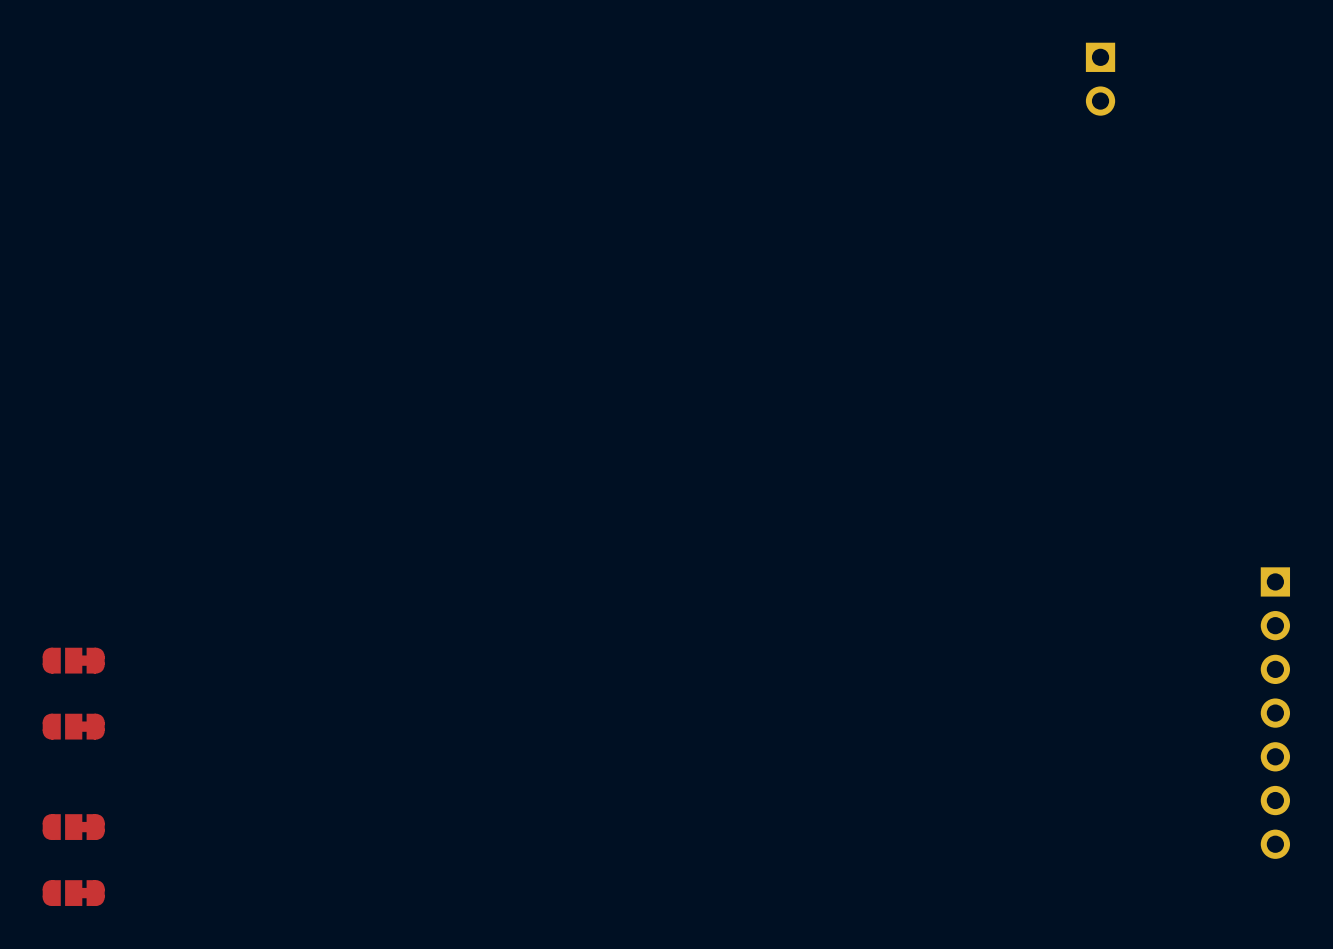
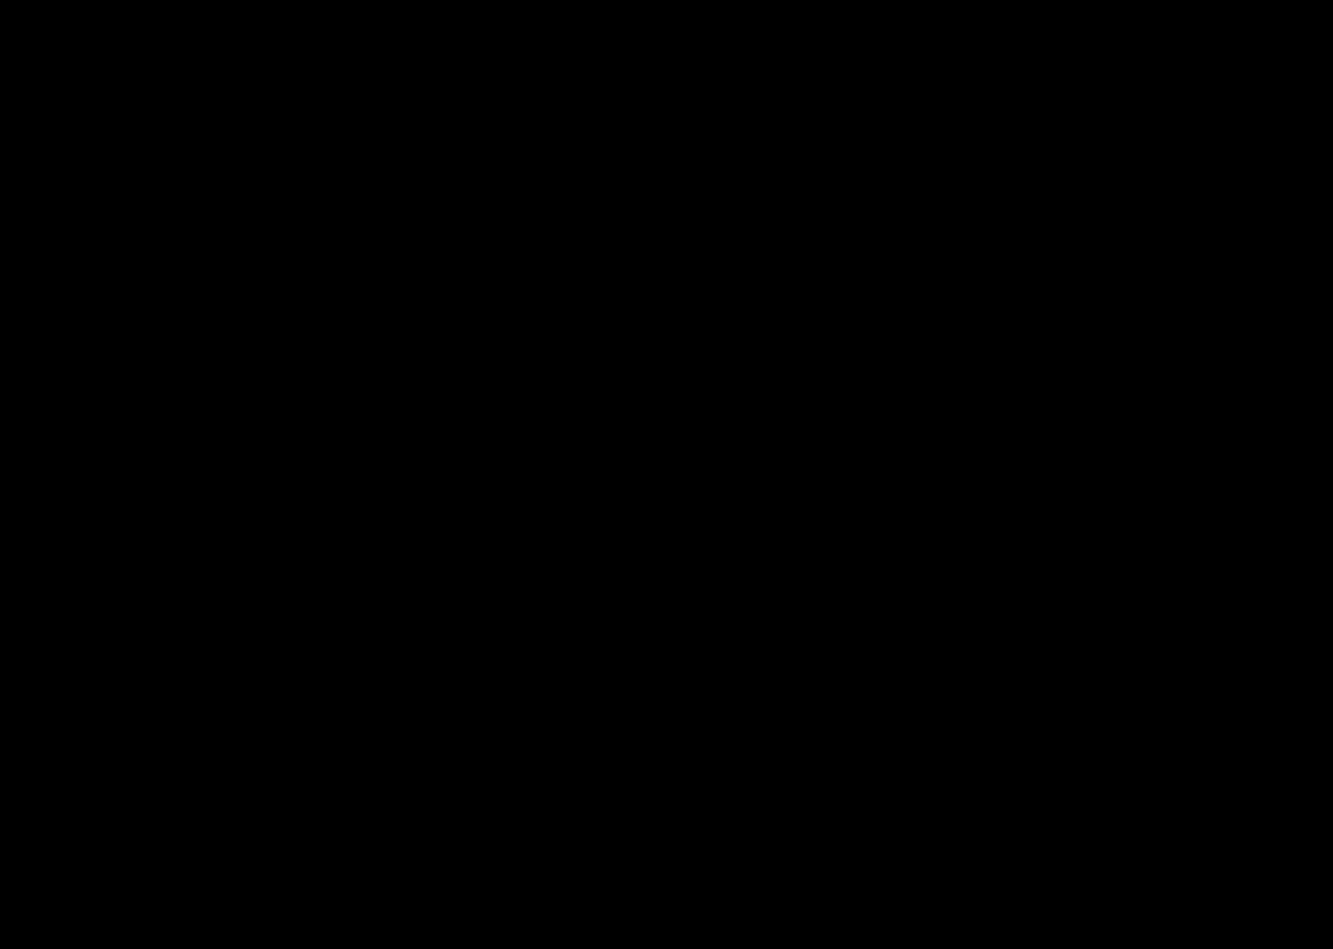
part: (1100, 79) -> none
part: (73, 660) -> none
part: (1275, 713) -> none
part: (73, 726) -> none
part: (73, 827) -> none
part: (73, 893) -> none

